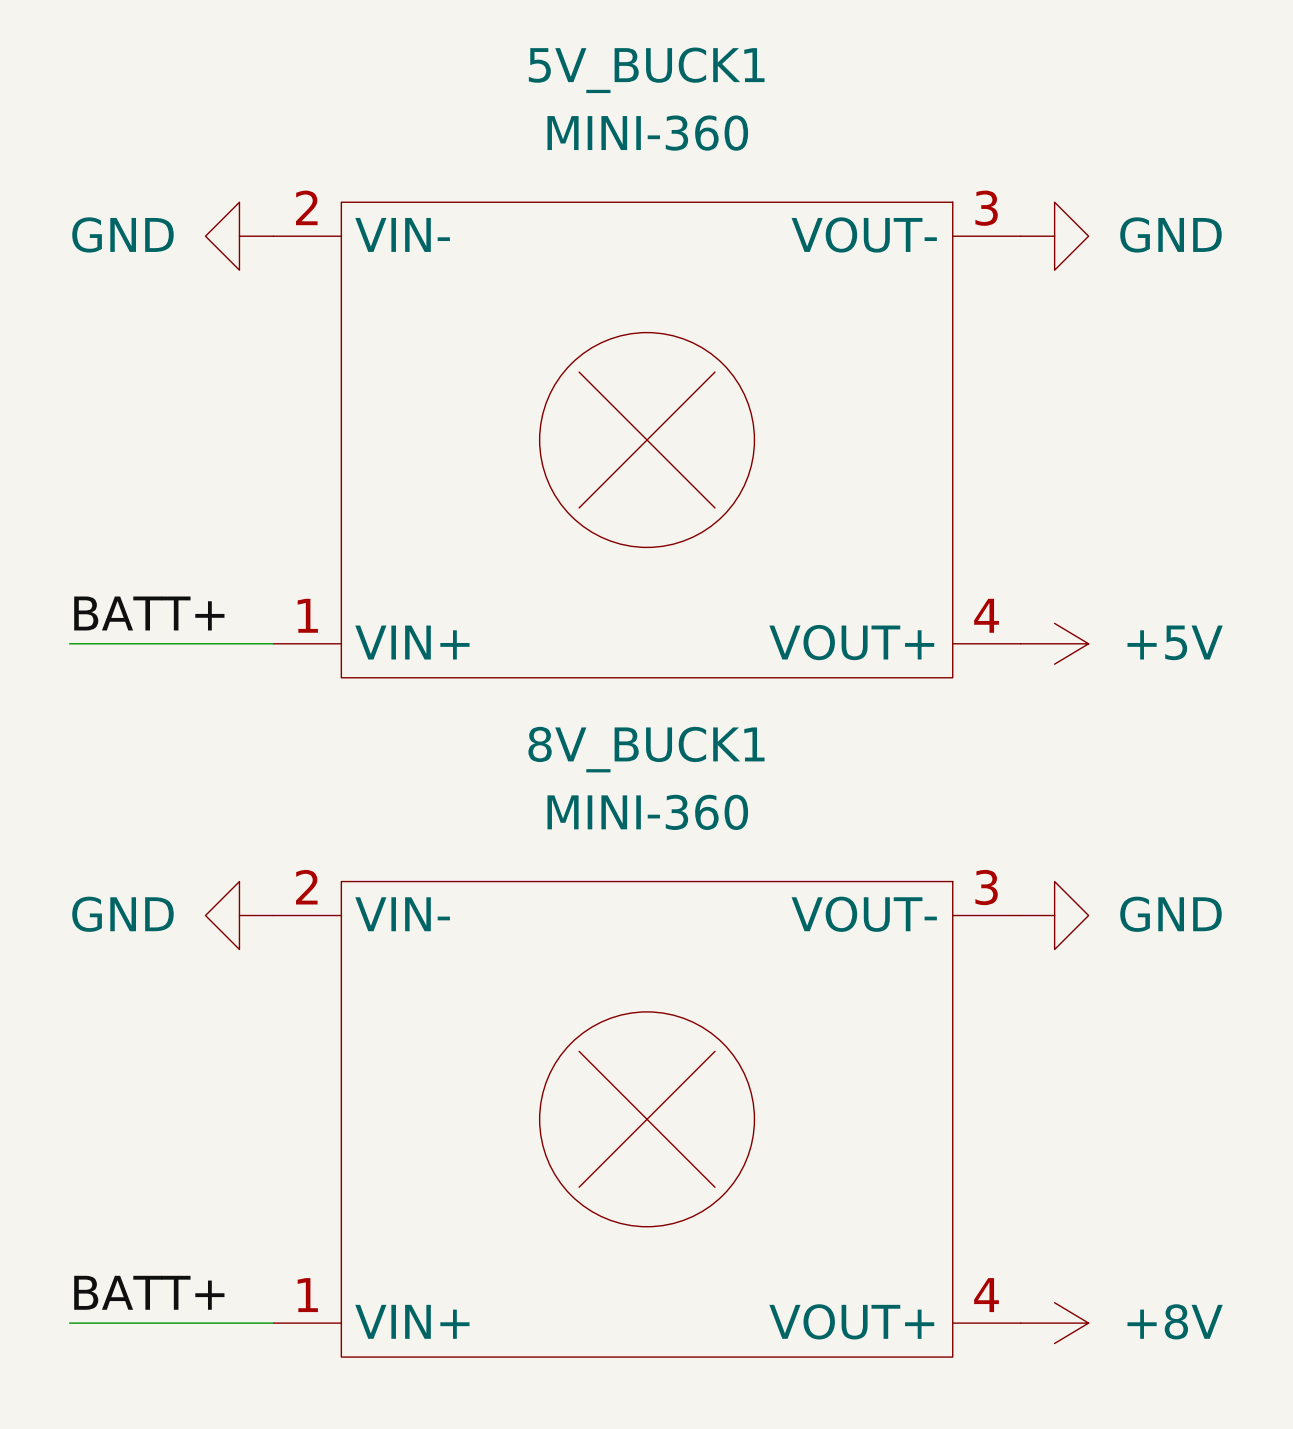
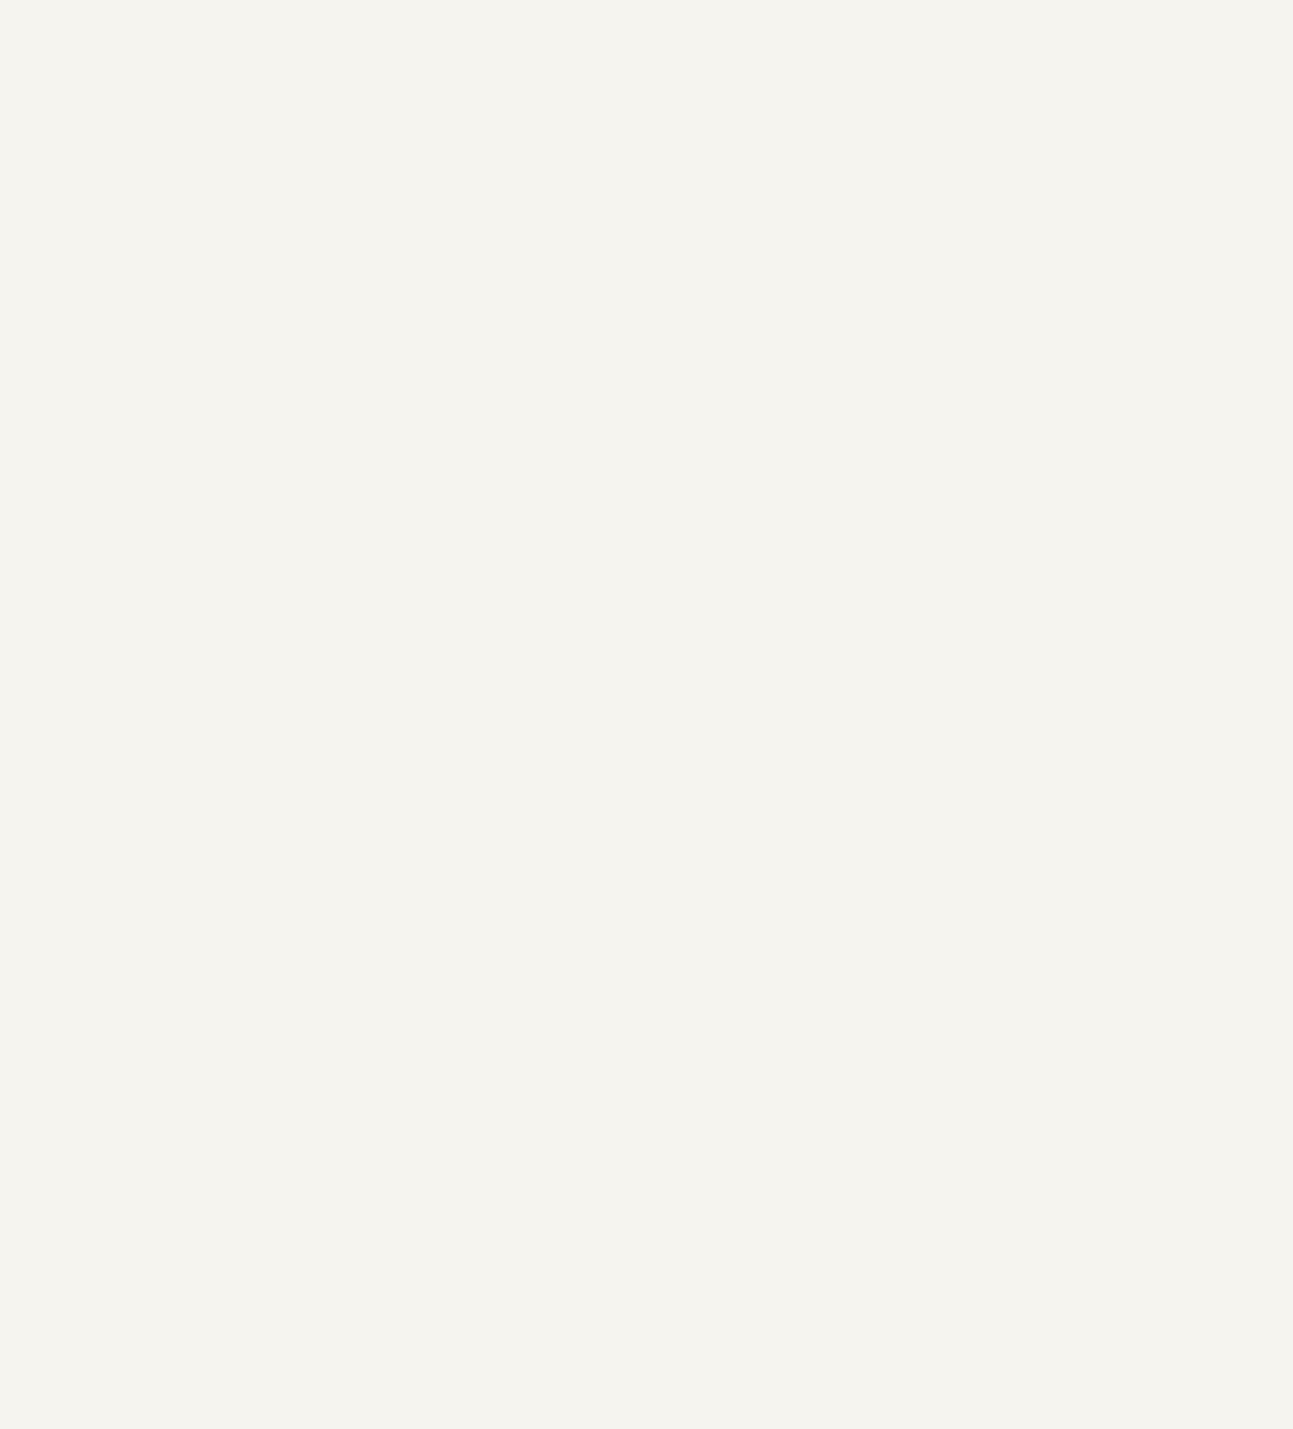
power symbol: GND (239, 236) -> none
power symbol: GND (1054, 236) -> none
5V_BUCK1: MINI-360 (647, 440) -> none
label: BATT+ (149, 613) -> none
wire: (69, 643) (273, 643) -> none
power symbol: +5V (1054, 643) -> none
power symbol: GND (239, 915) -> none
power symbol: GND (1054, 915) -> none
8V_BUCK1: MINI-360 (647, 1119) -> none
label: BATT+ (149, 1292) -> none
wire: (69, 1323) (273, 1323) -> none
power symbol: +8V (1054, 1323) -> none

